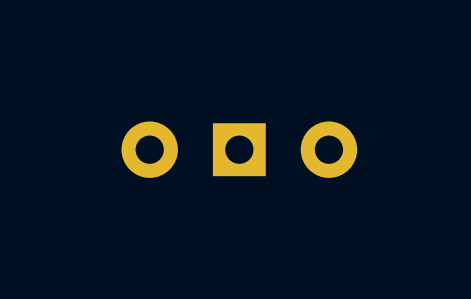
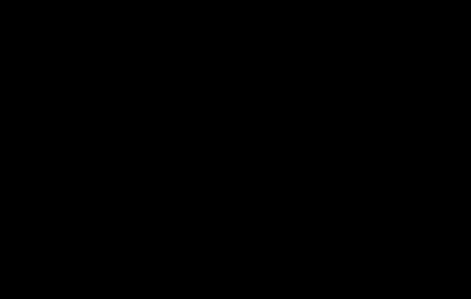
part: (239, 149) -> none

